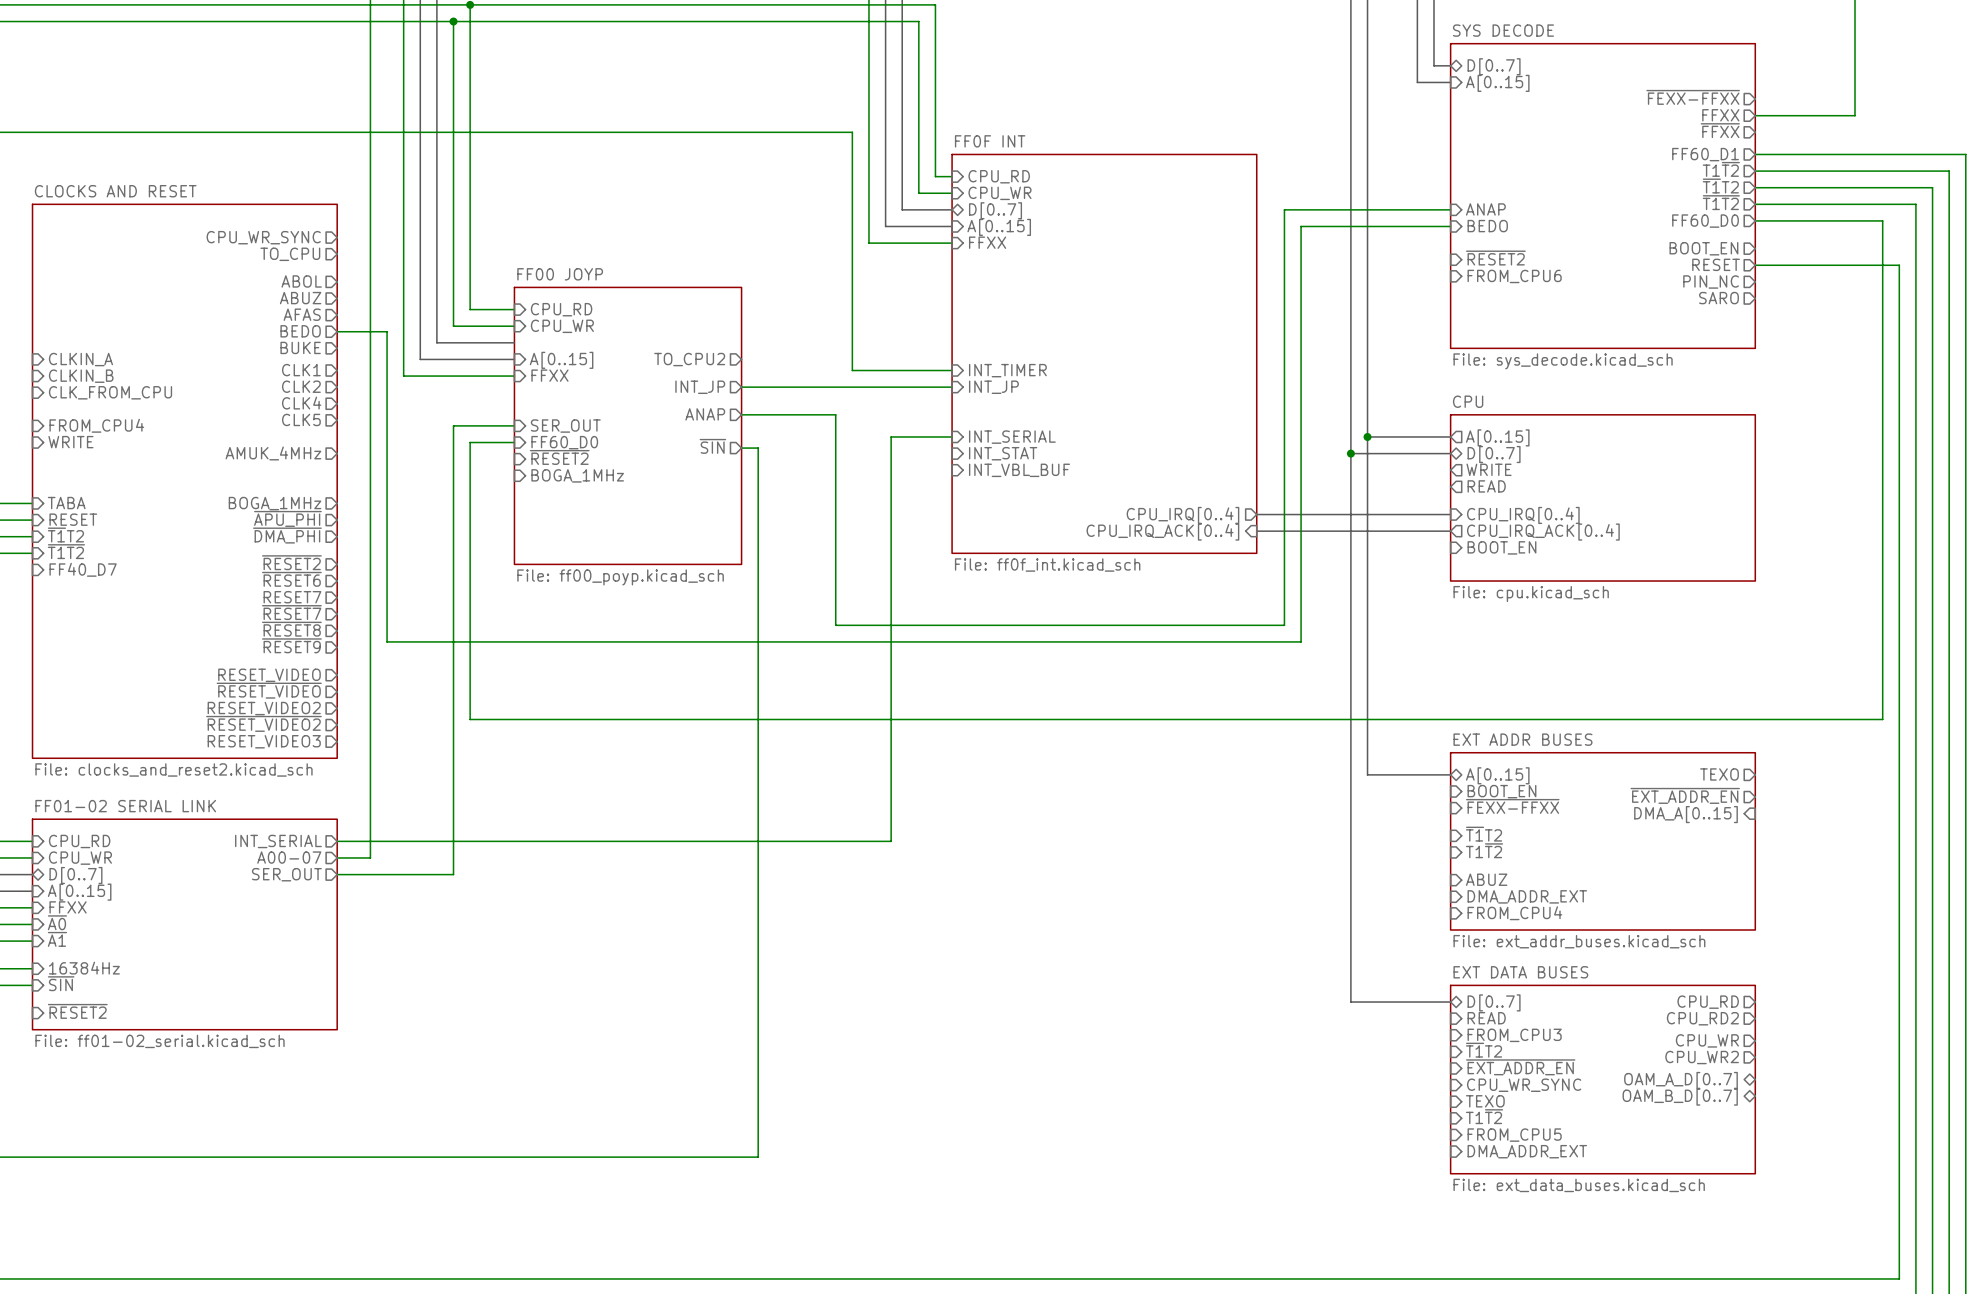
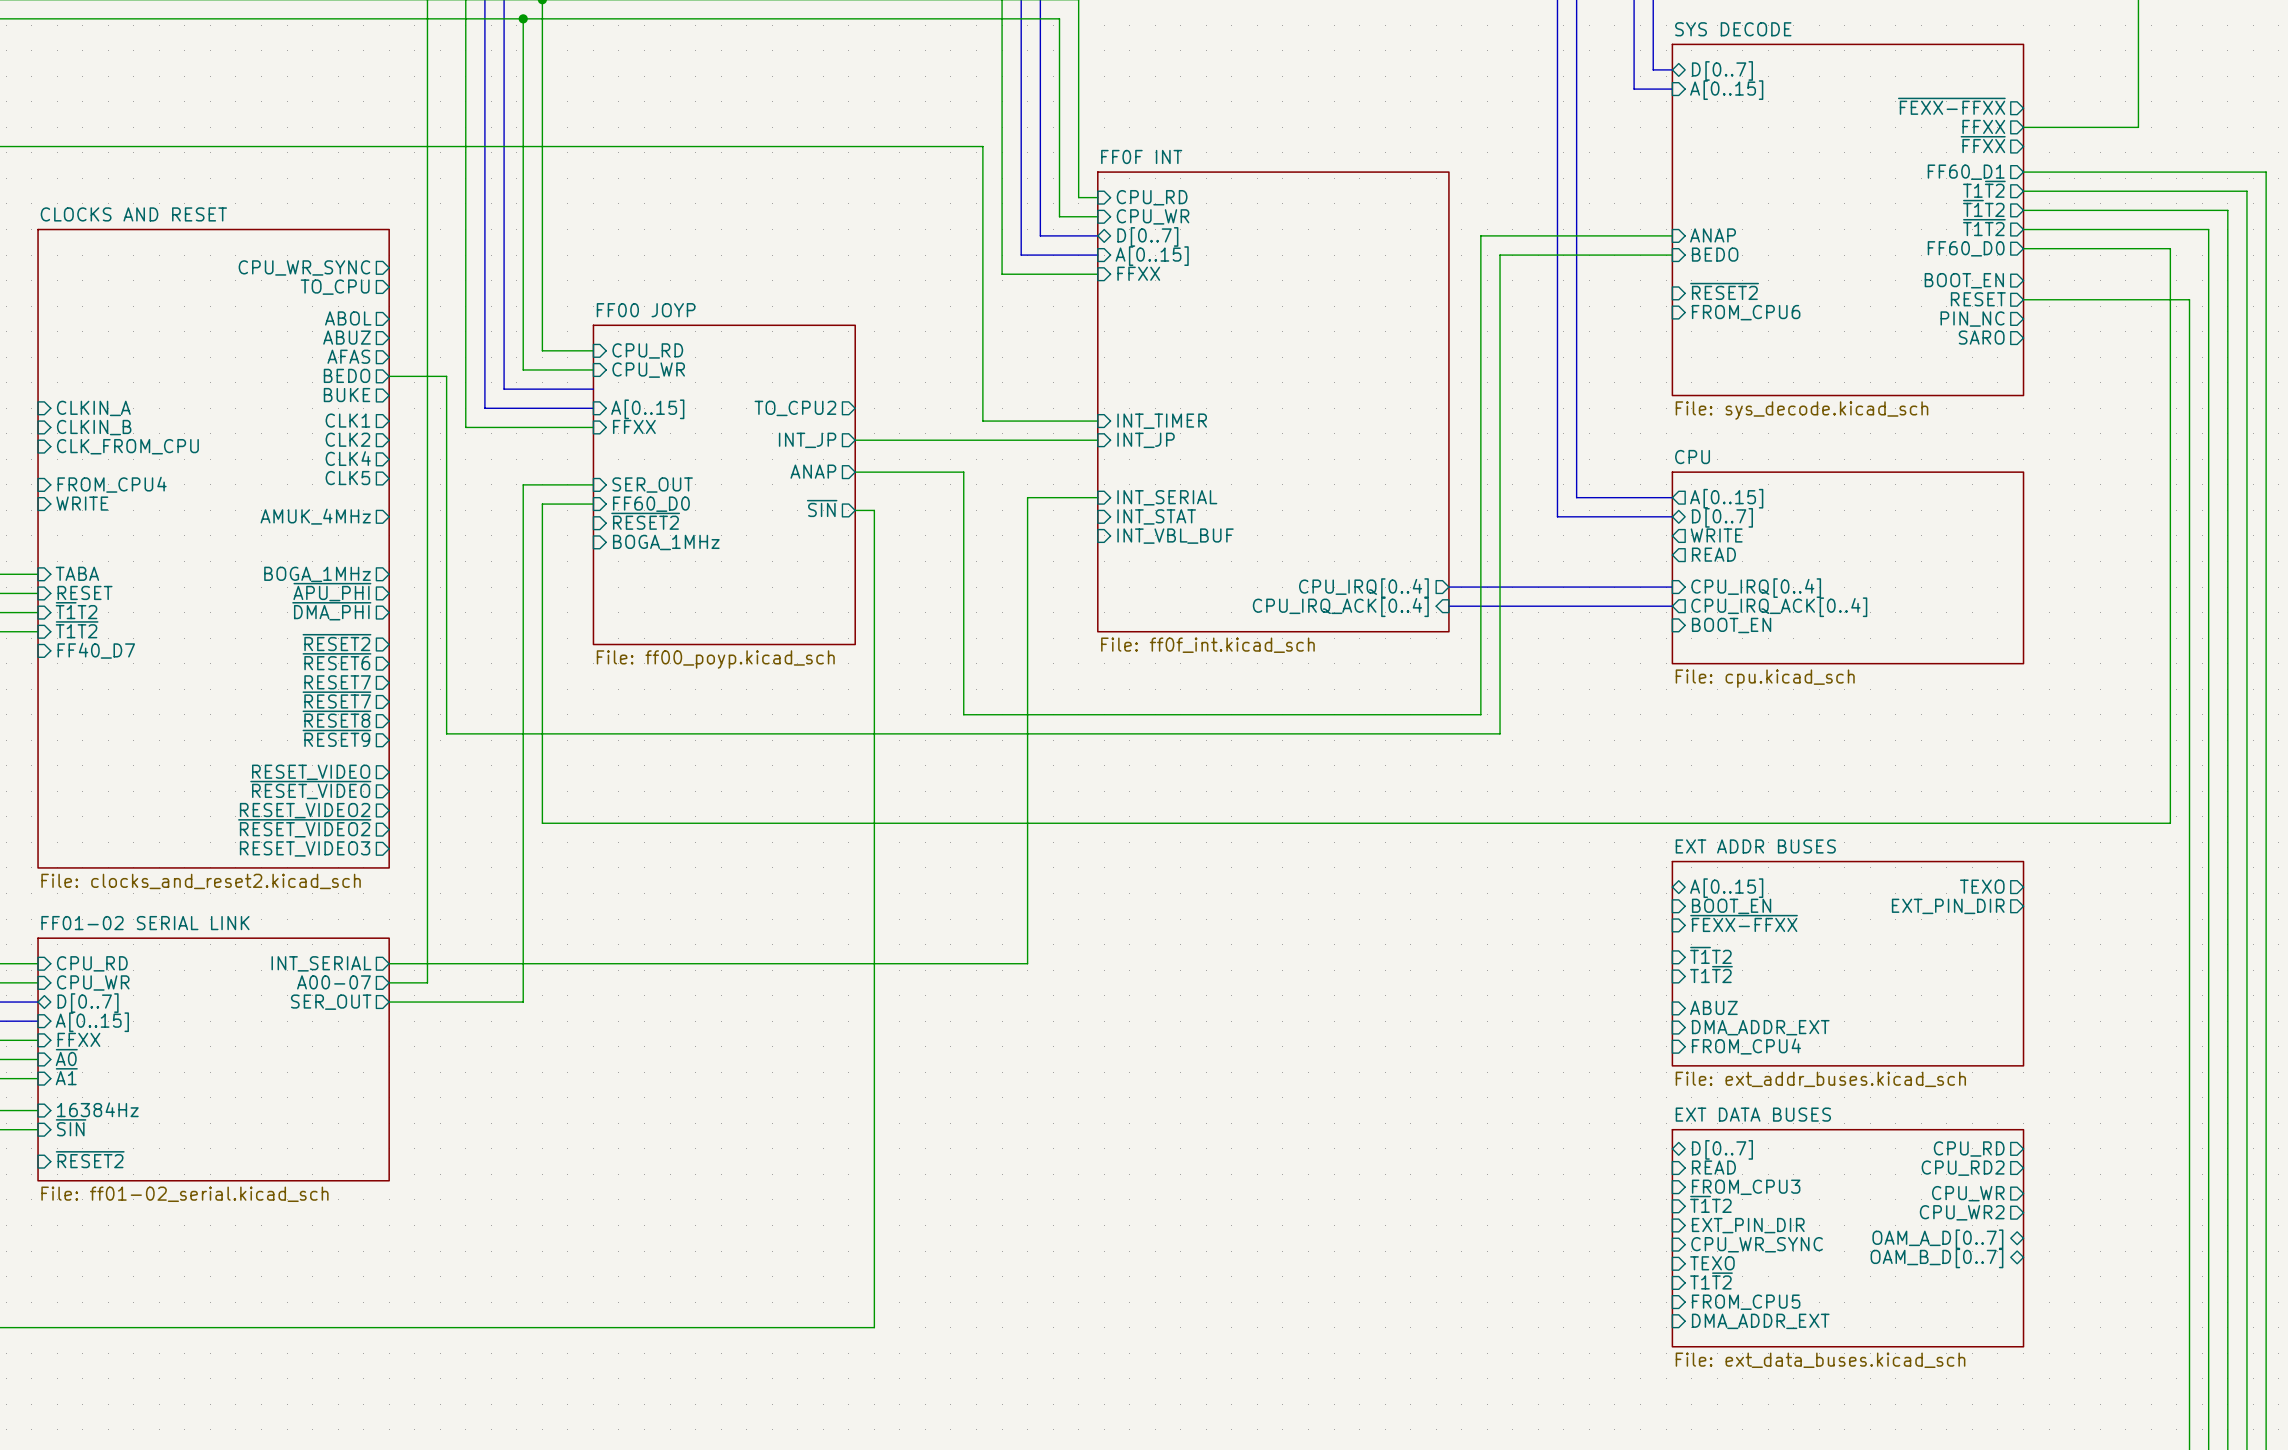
bus: (1367, 436) (1367, 774) (1450, 774) -> none
junction: (1367, 436) -> none
bus: (1350, 453) (1350, 1002) (1450, 1002) -> none
junction: (1350, 453) -> none
sheet pin: ~{EXT_ADDR_EN} (1685, 795) -> EXT_PIN_DIR (1948, 906)
sheet pin: DMA_A[0..15] (1686, 814) -> none
sheet pin: ~{EXT_ADDR_EN} (1520, 1067) -> EXT_PIN_DIR (1748, 1225)

